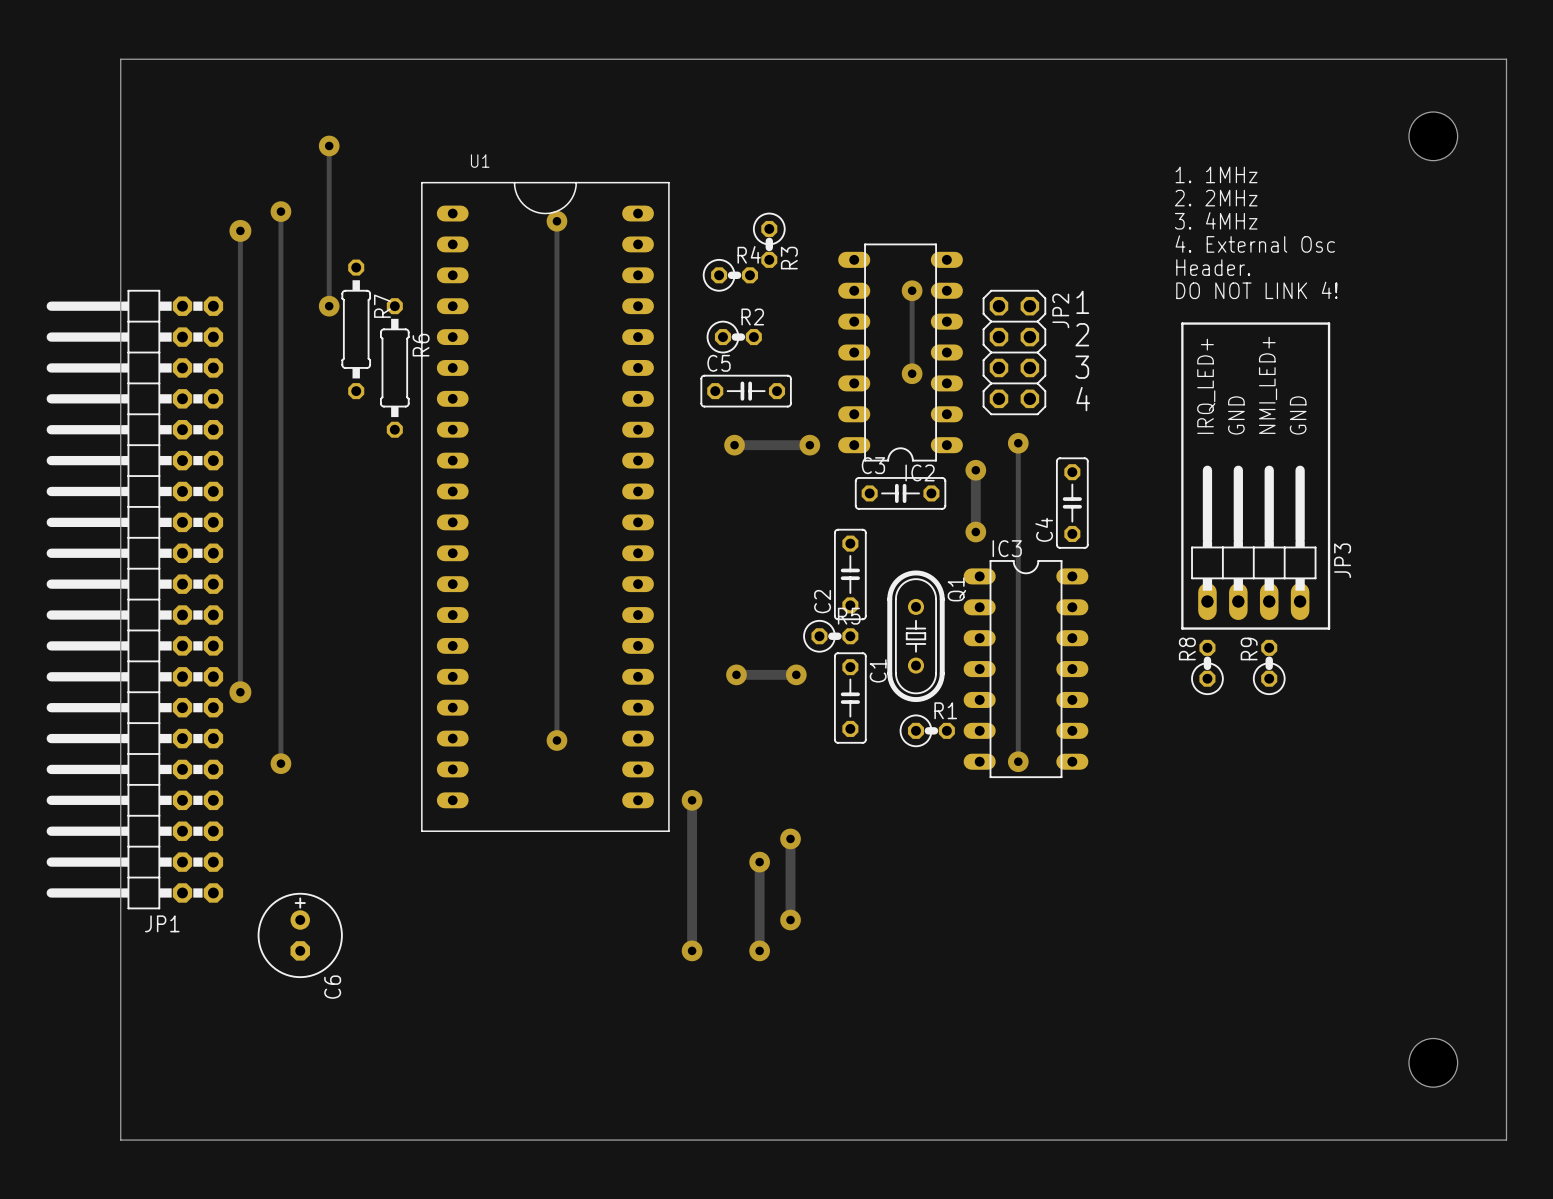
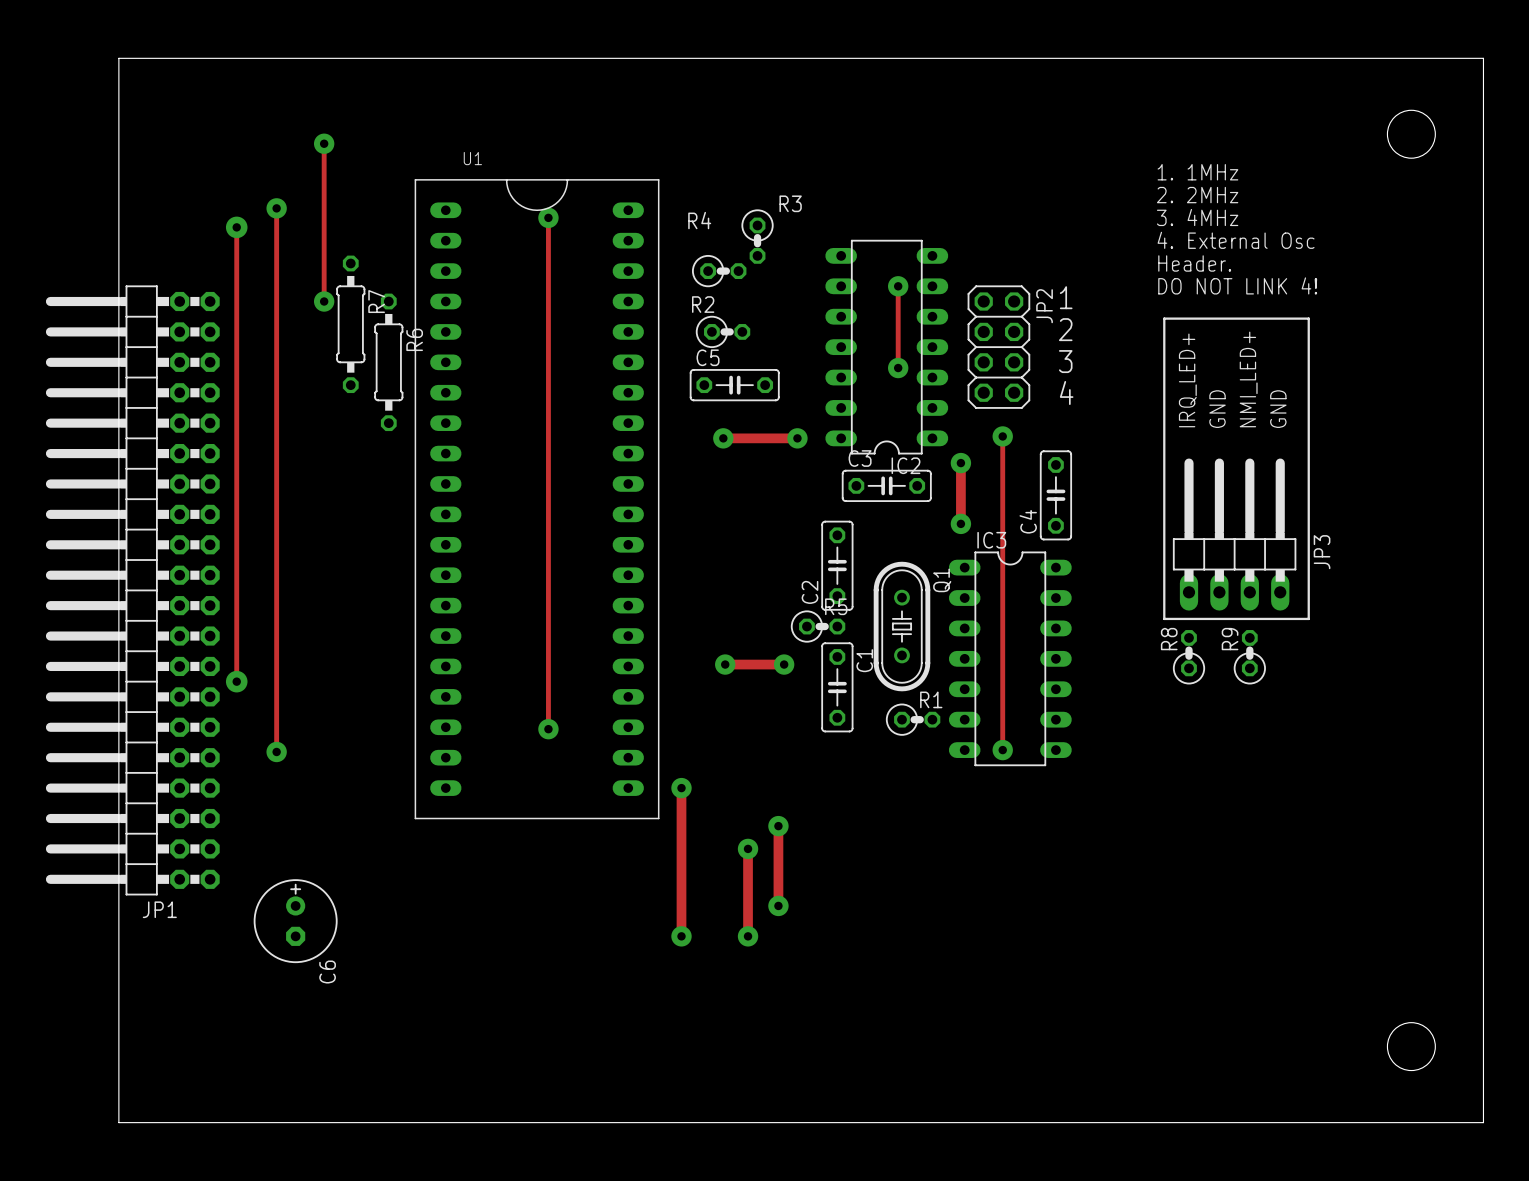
R4 name position: R4 (749, 254) -> R4 (699, 220)
R3 name rotation: 0° (789, 258) -> 90° clockwise (790, 203)
R3 name position: R3 (789, 258) -> R3 (790, 203)
R2 name position: R2 (752, 316) -> R2 (703, 304)

